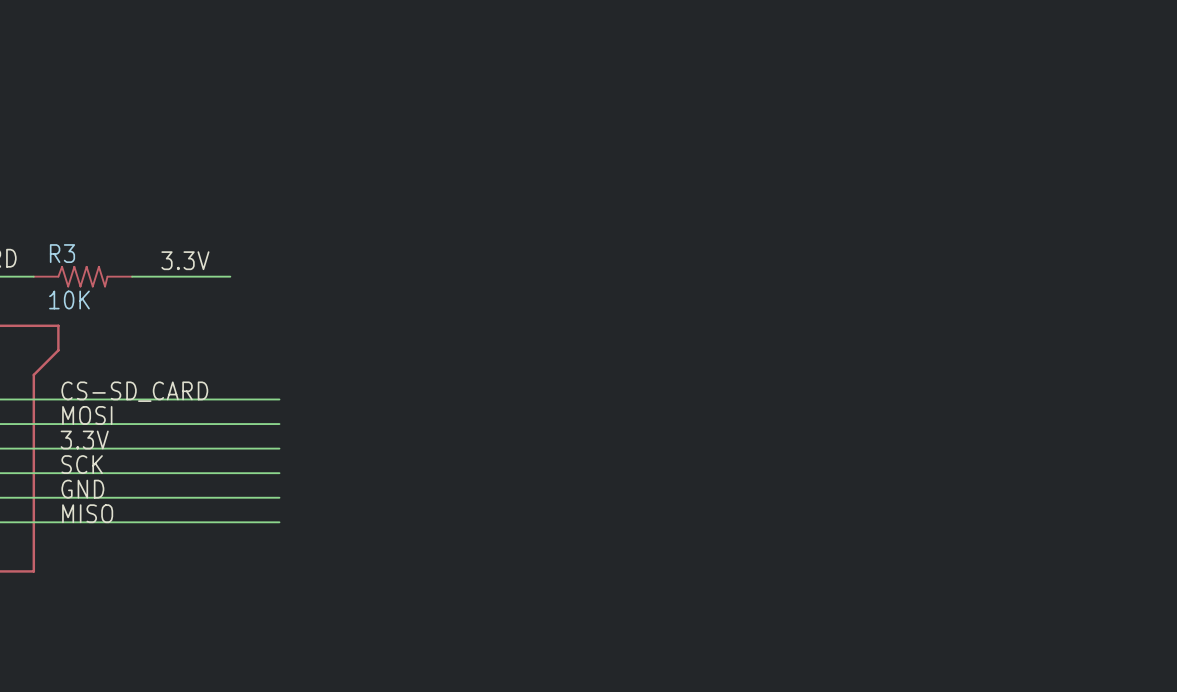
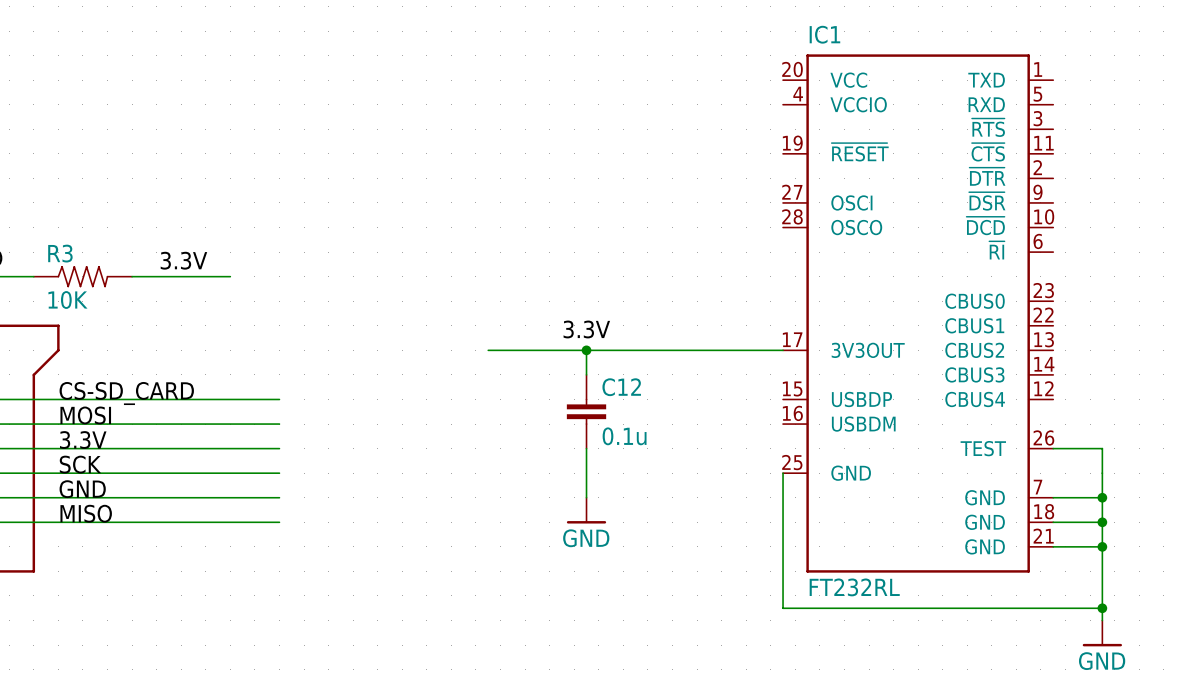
IC1: none -> FT232RL (918, 313)
label: none -> 3.3V (586, 329)
wire: none -> (488, 350) (783, 350)
wire: none -> (586, 350) (586, 374)
junction: none -> (586, 350)
C12: none -> 0.1u (586, 411)
wire: none -> (586, 448) (586, 497)
wire: none -> (1053, 448) (1102, 448) (1102, 620)
wire: none -> (783, 473) (783, 608) (1102, 608)
wire: none -> (1053, 497) (1102, 497)
junction: none -> (1102, 497)
power symbol: none -> GND (586, 510)
wire: none -> (1053, 522) (1102, 522)
junction: none -> (1102, 522)
wire: none -> (1053, 546) (1102, 546)
junction: none -> (1102, 546)
junction: none -> (1102, 608)
power symbol: none -> GND (1102, 633)

